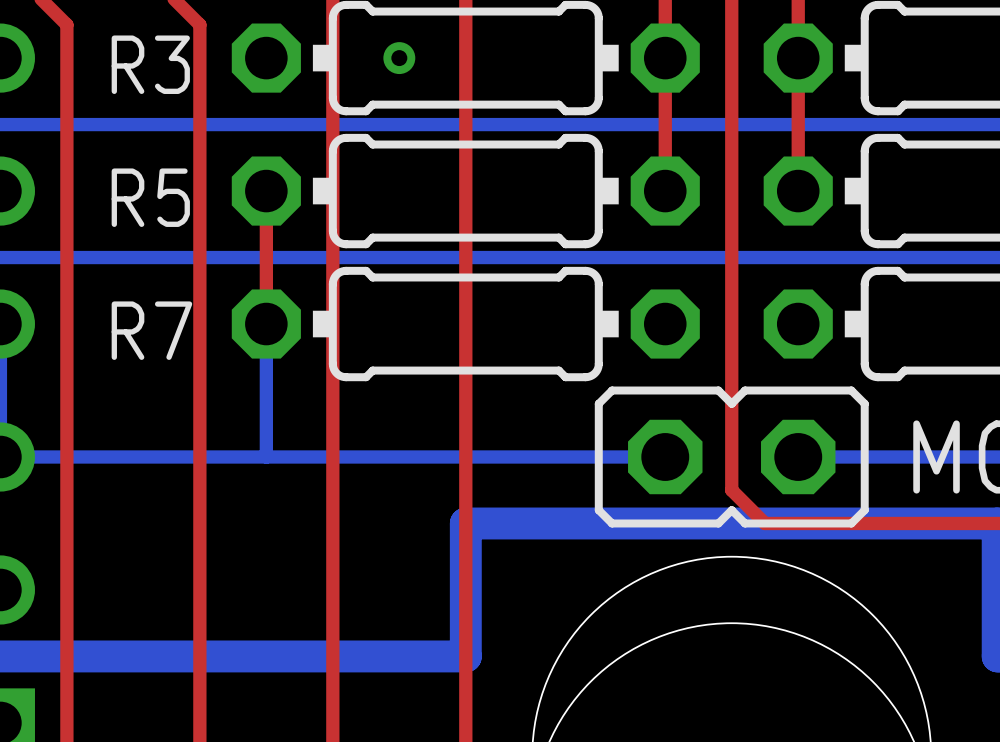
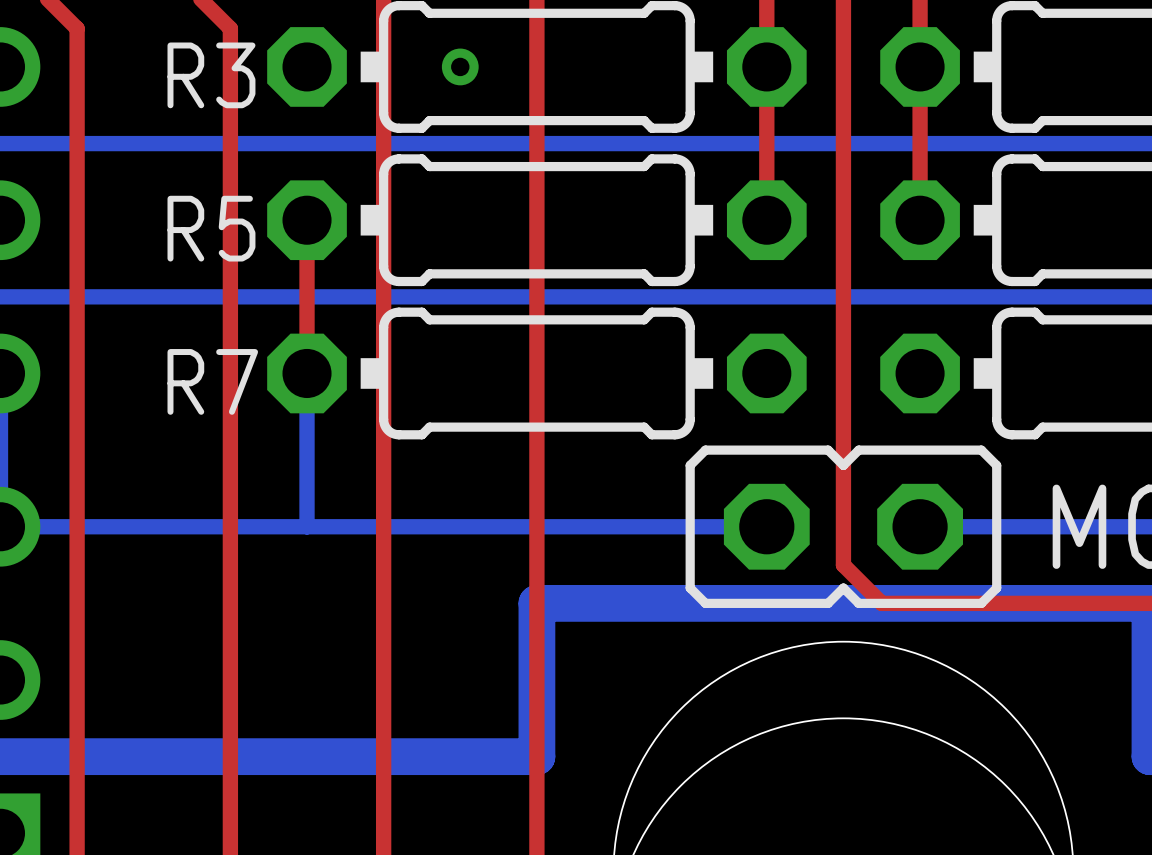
R3 name position: R3 (150, 64) -> R3 (211, 75)
R5 name position: R5 (150, 197) -> R5 (211, 228)
R7 name position: R7 (151, 330) -> R7 (212, 381)

